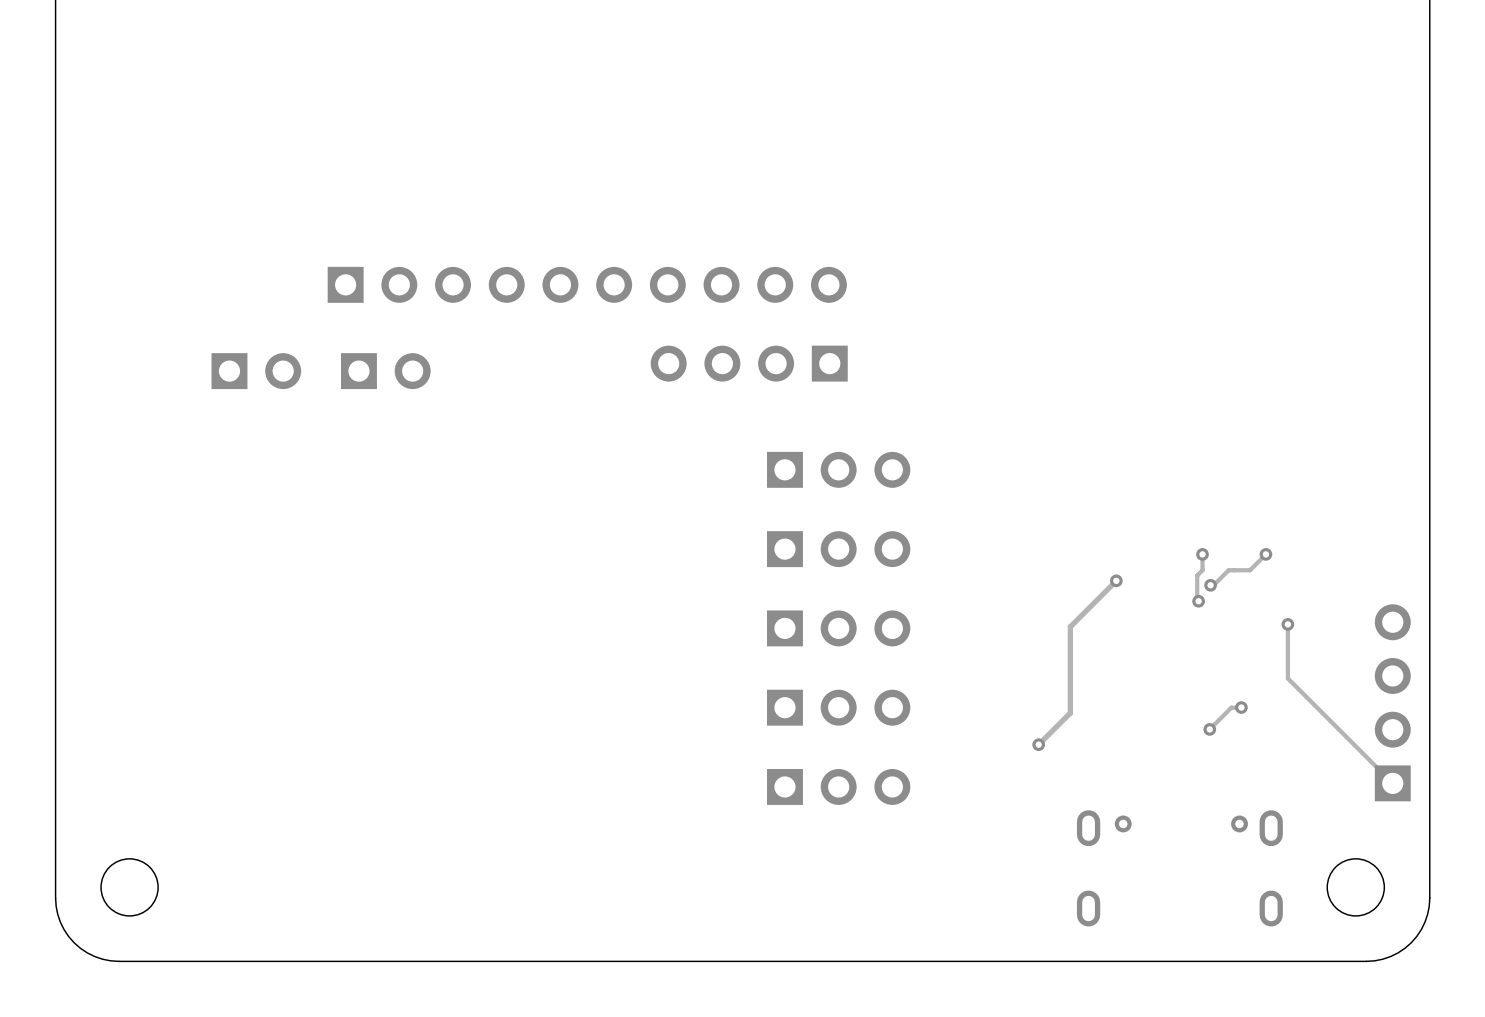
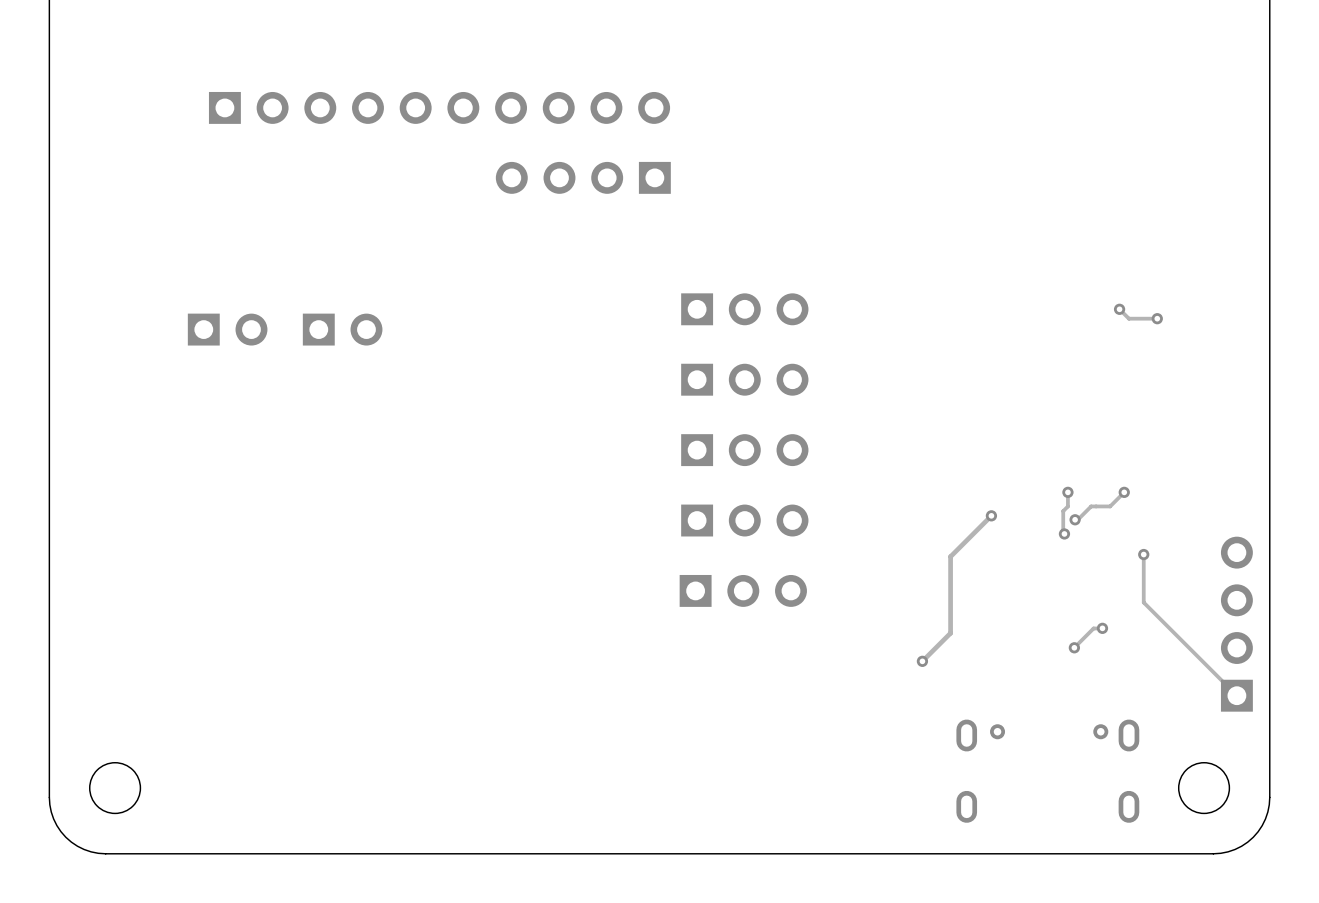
part position: (587, 284) -> (439, 107)
part: none -> (744, 309)
track: none -> (1119, 309) (1128, 318) (1157, 318)
via: none -> (1119, 309)
via: none -> (1157, 318)
part position: (749, 363) -> (583, 177)
part: none -> (744, 379)
part: (838, 469) -> none
part: none -> (744, 450)
part: (838, 549) -> none
part: none -> (744, 520)
part: (838, 628) -> none
part: none -> (743, 590)
part: (838, 707) -> none
part: (838, 786) -> none

